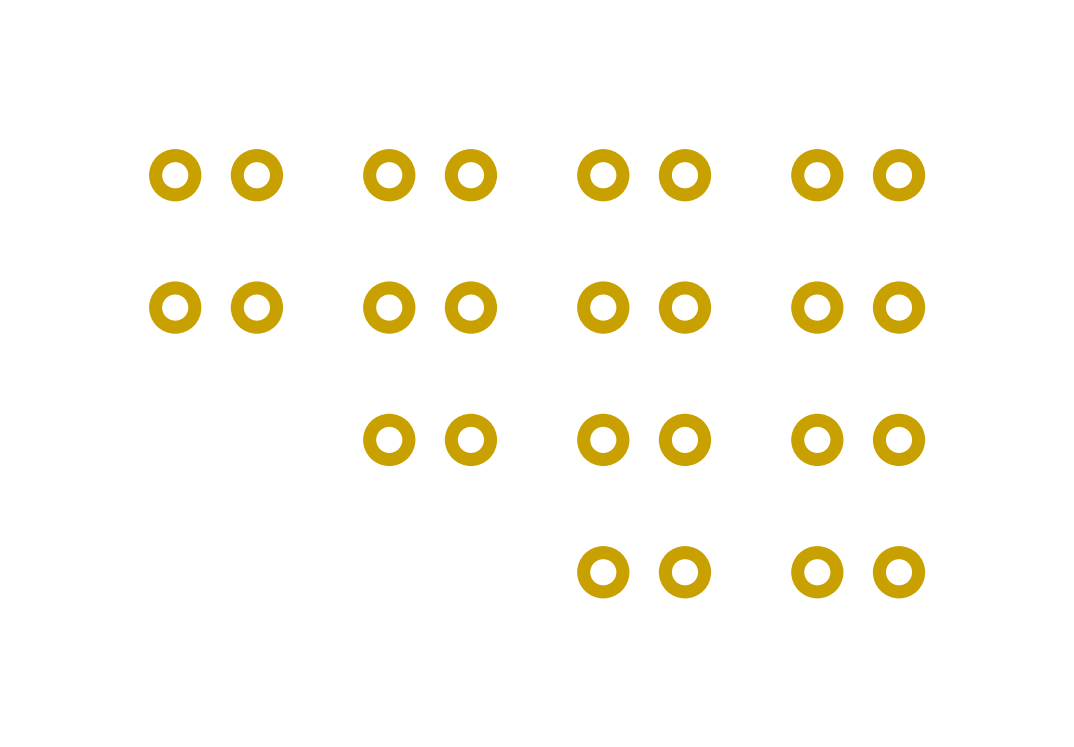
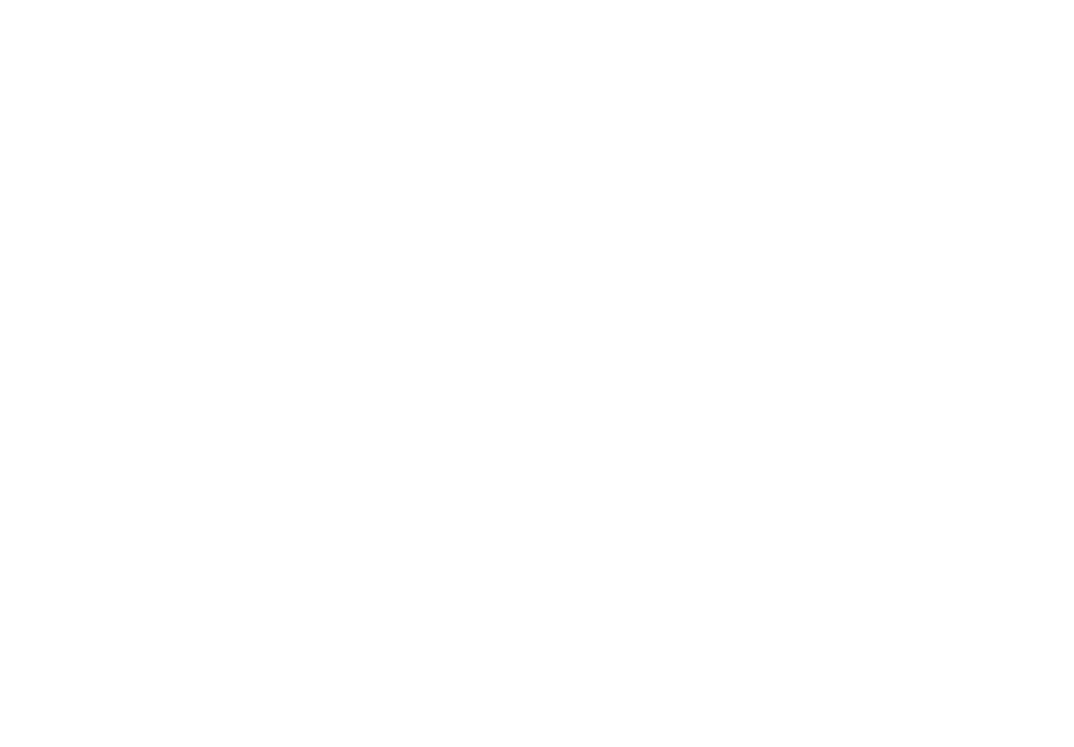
part: (216, 175) -> none
part: (430, 175) -> none
part: (644, 175) -> none
part: (858, 175) -> none
part: (216, 307) -> none
part: (430, 307) -> none
part: (644, 307) -> none
part: (858, 307) -> none
part: (430, 439) -> none
part: (644, 439) -> none
part: (858, 439) -> none
part: (644, 572) -> none
part: (858, 572) -> none

